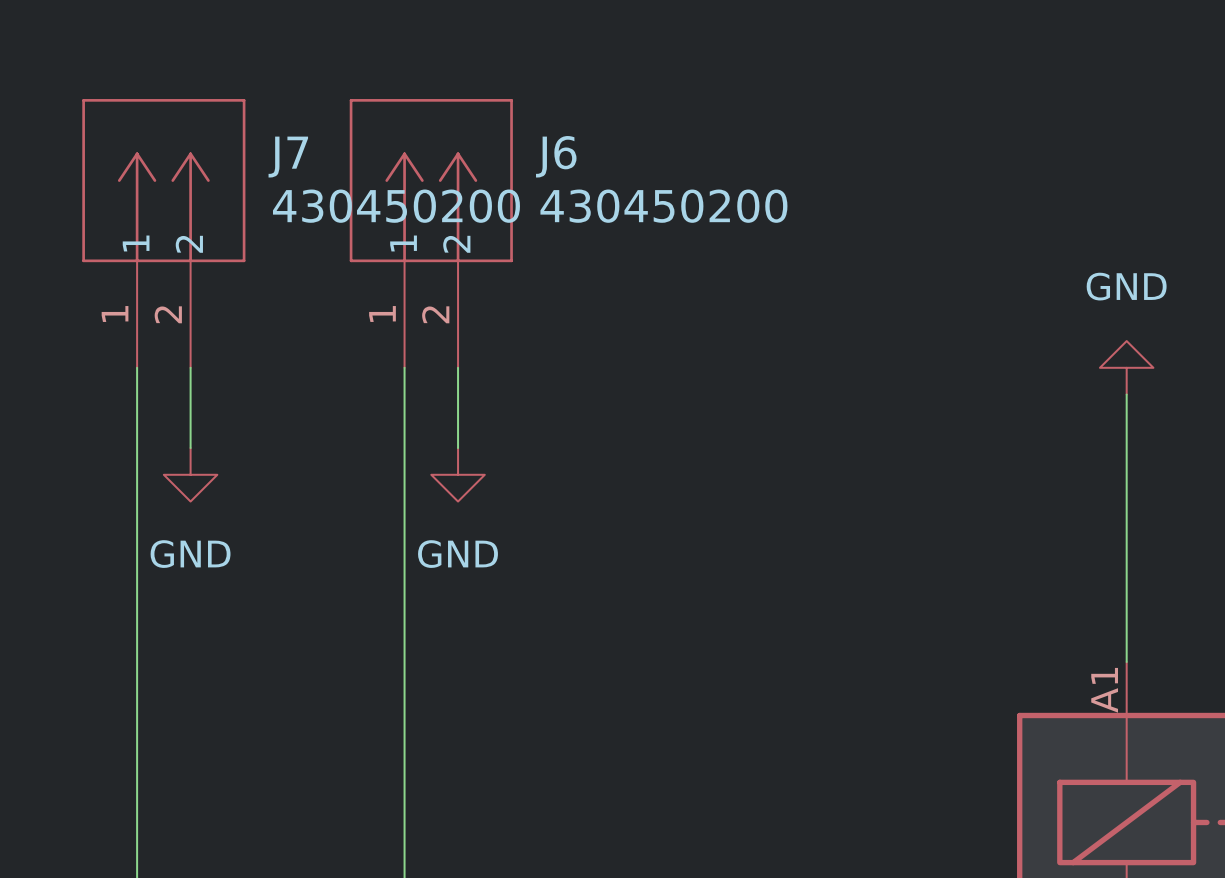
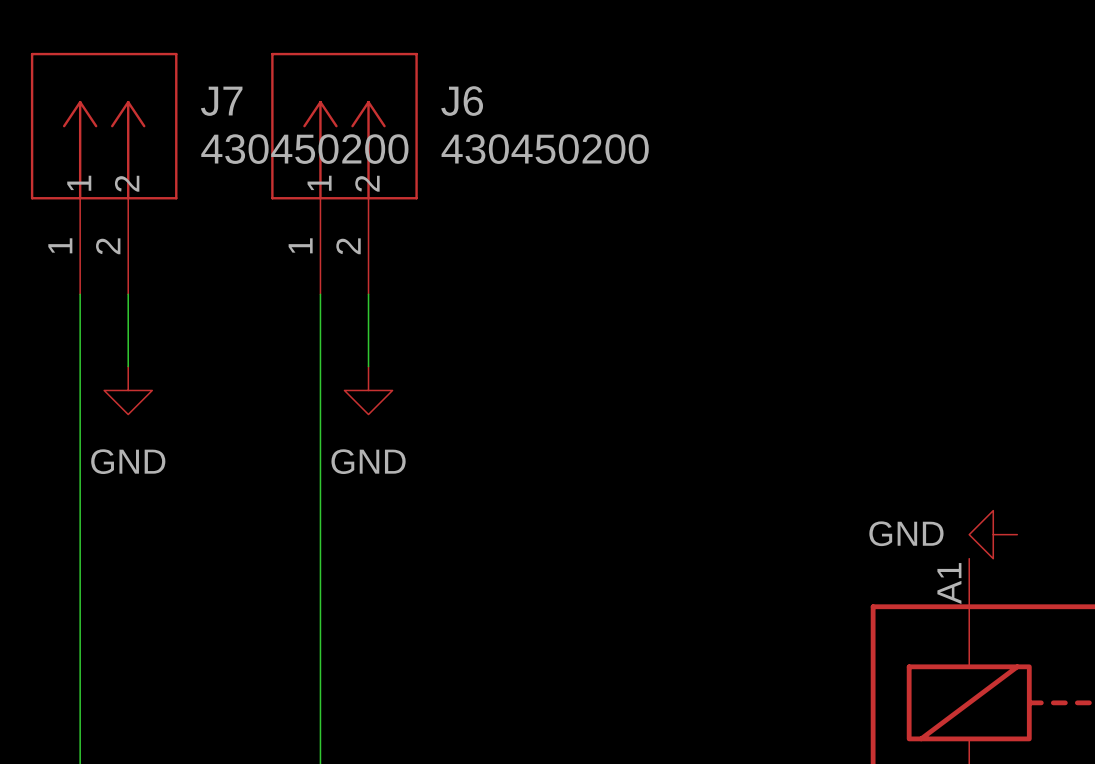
power symbol rotation: 0° (1126, 367) -> 90° counterclockwise (993, 534)
power symbol position: GND (1126, 367) -> GND (993, 534)
wire: (1126, 394) (1126, 662) -> none

